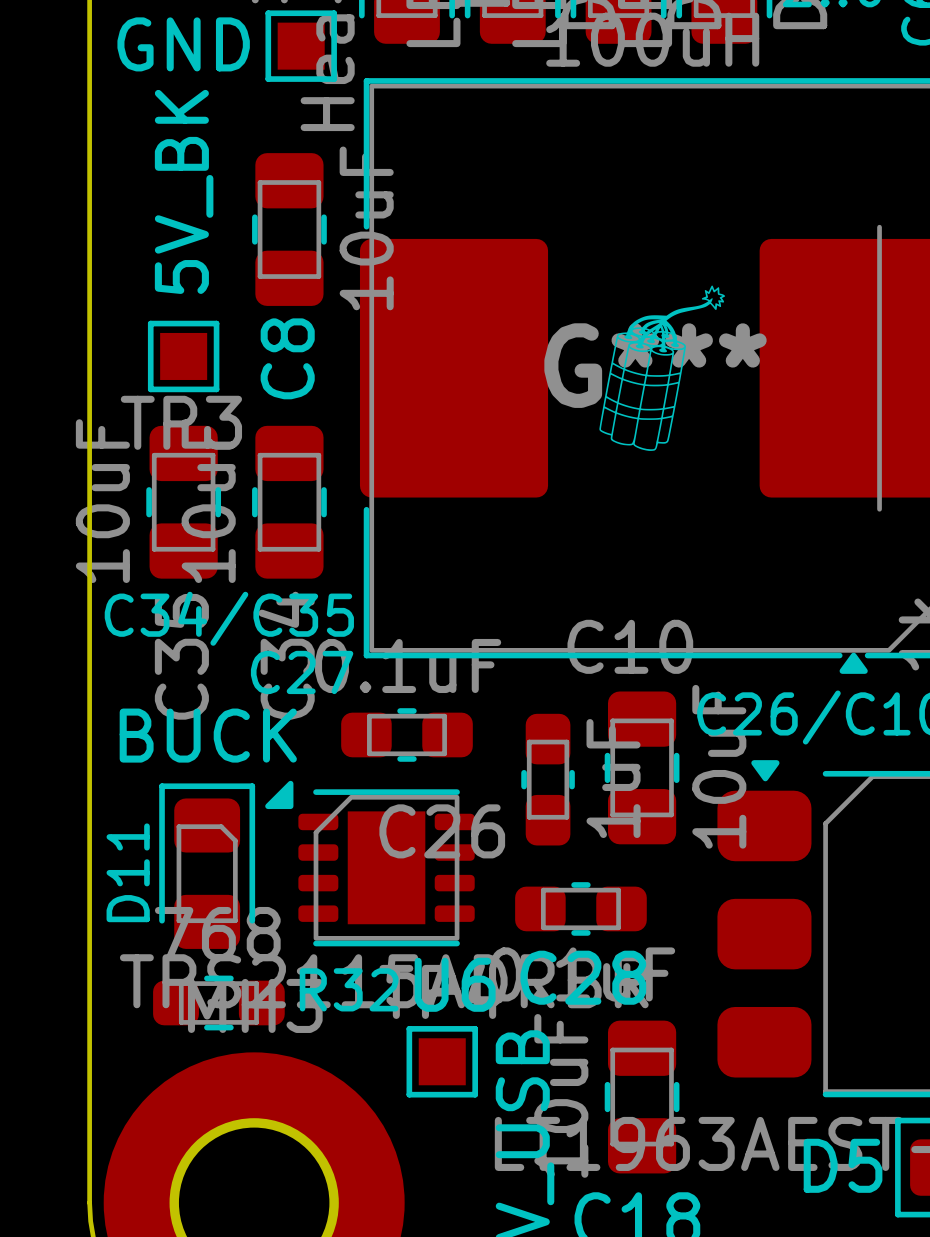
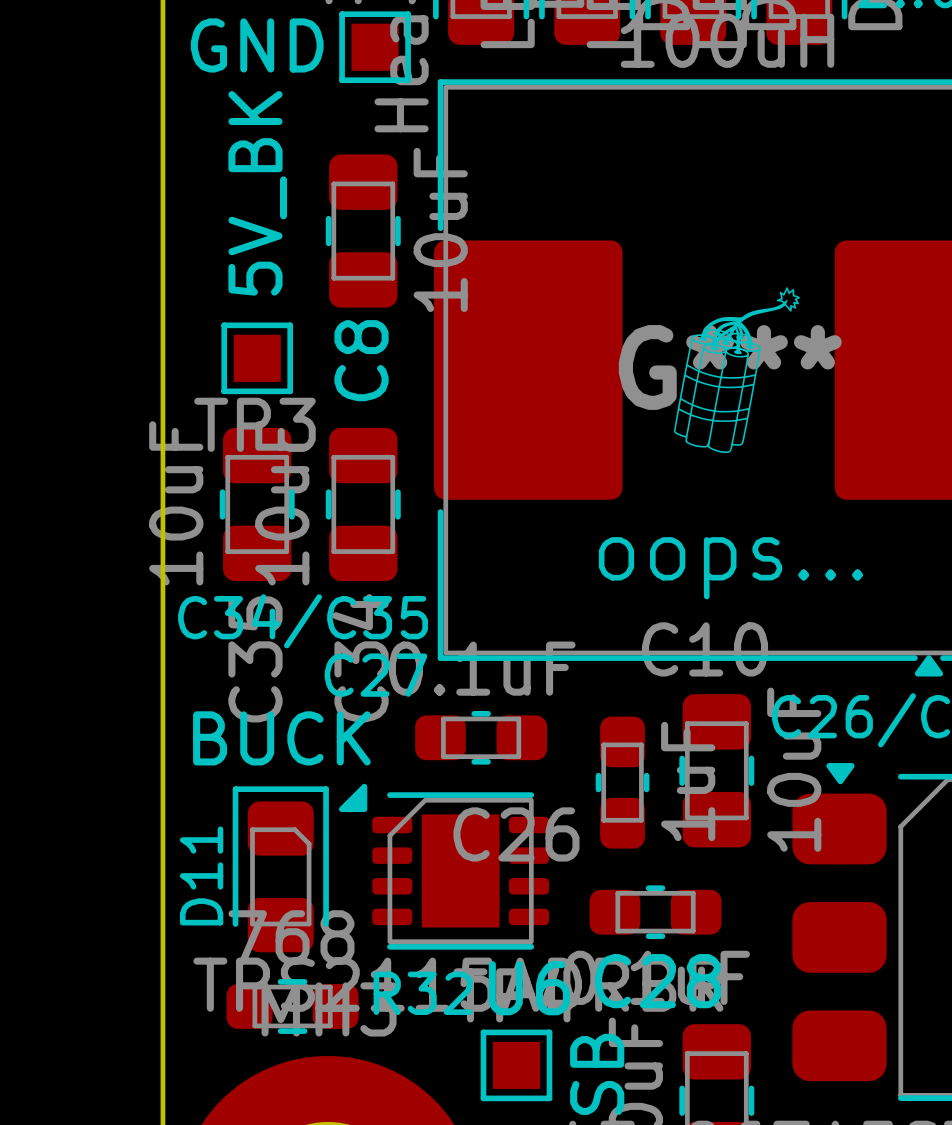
text: none -> oops... (730, 568)

